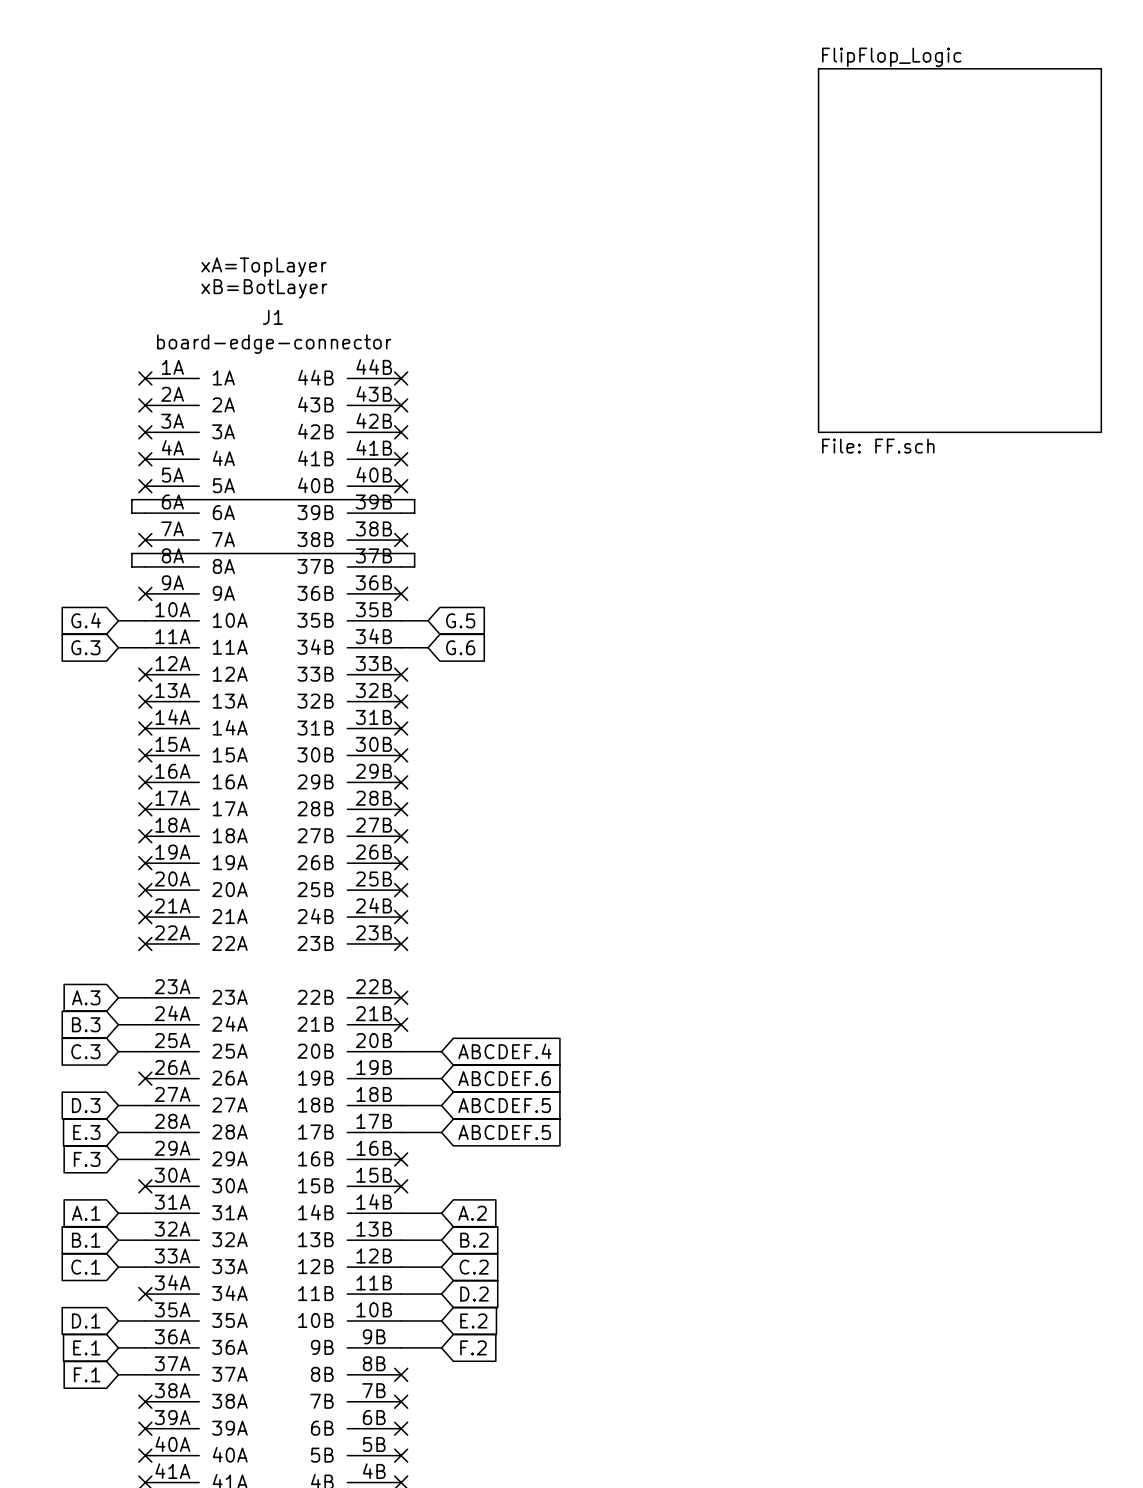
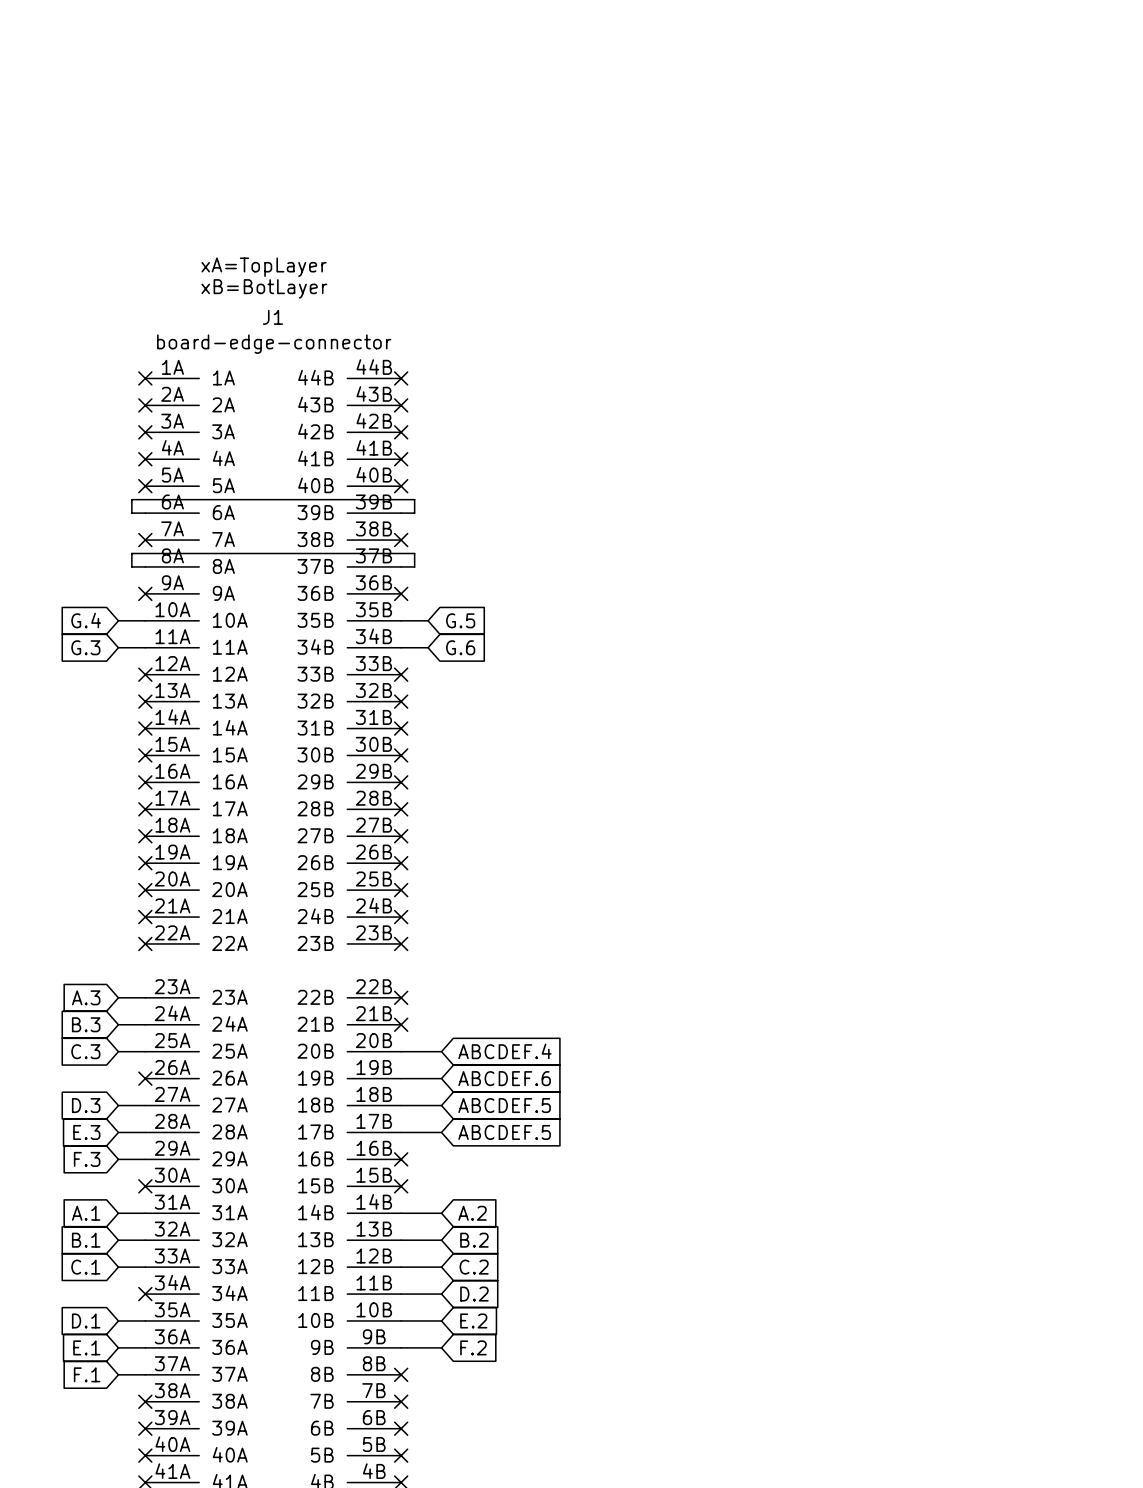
sheet FlipFlop_Logic: File: FF.sch (959, 250) -> none

